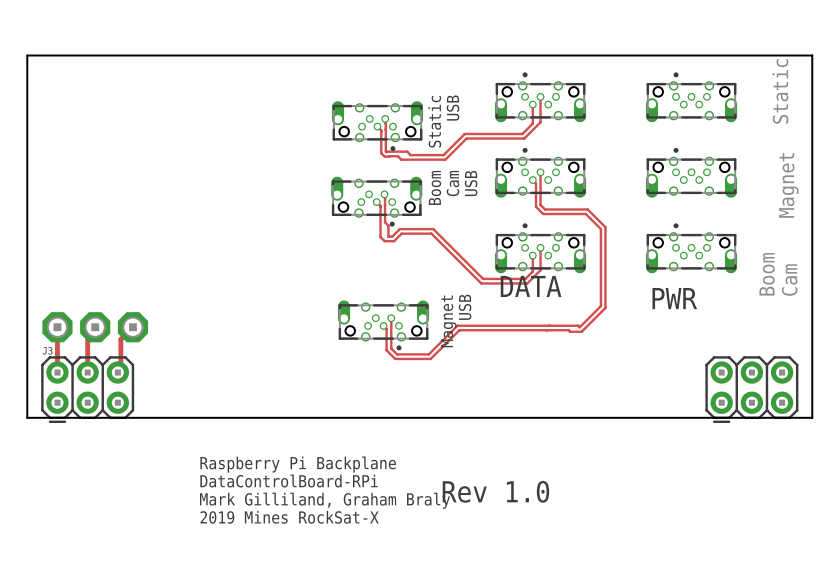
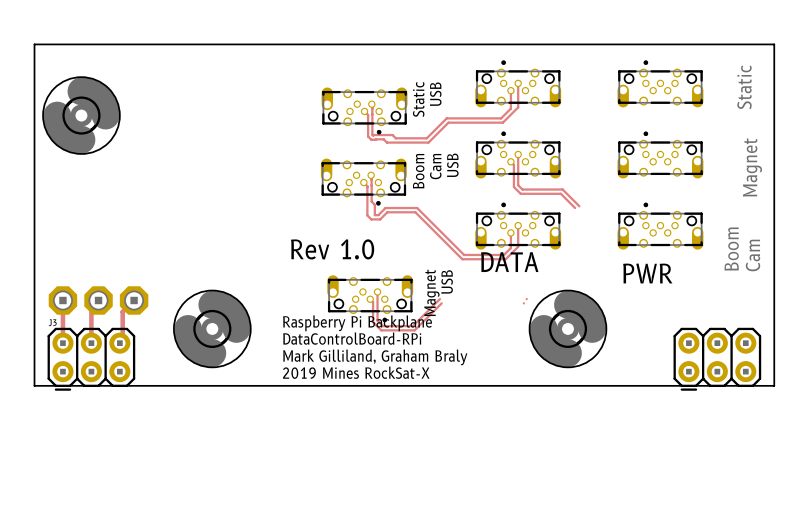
part: none -> (81, 115)
track: (605, 227) (605, 307) (581, 331) (459, 330) -> none
track: (600, 229) (600, 306) (579, 327) (457, 325) -> none
part: none -> (212, 328)
part: none -> (567, 328)
text position: Raspberry Pi Backplane (298, 464) -> Raspberry Pi Backplane (357, 323)
text position: DataControlBoard-RPi (289, 481) -> DataControlBoard-RPi (352, 338)
text position: Rev 1.0 (495, 491) -> Rev 1.0 (332, 249)
text position: Mark Gilliland, Graham Braly (325, 500) -> Mark Gilliland, Graham Braly (375, 357)
text position: 2019 Mines RockSat-X (289, 517) -> 2019 Mines RockSat-X (356, 372)

